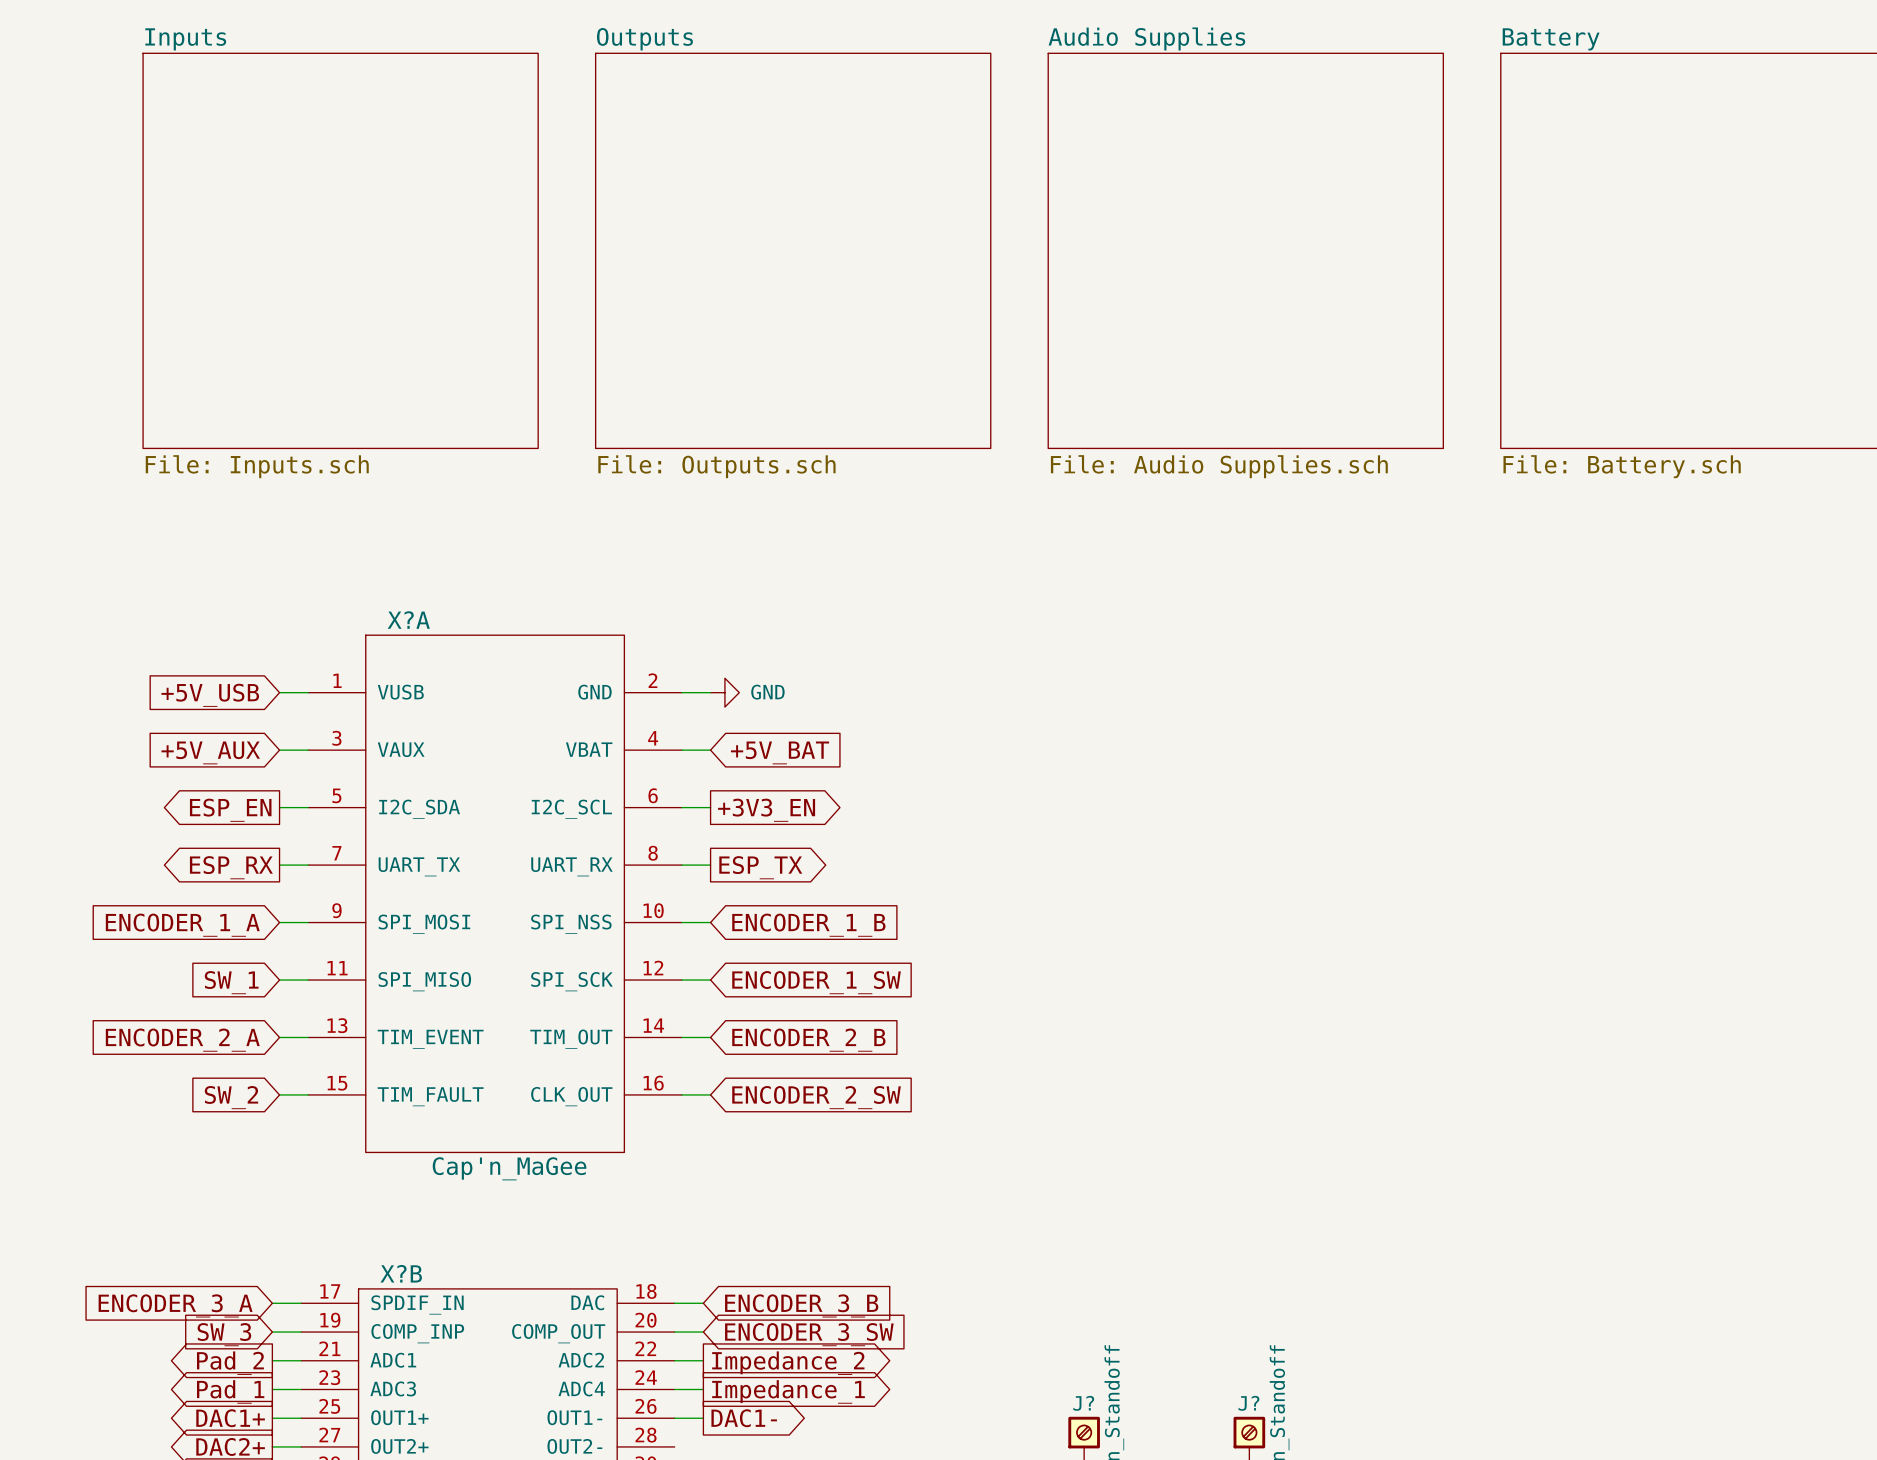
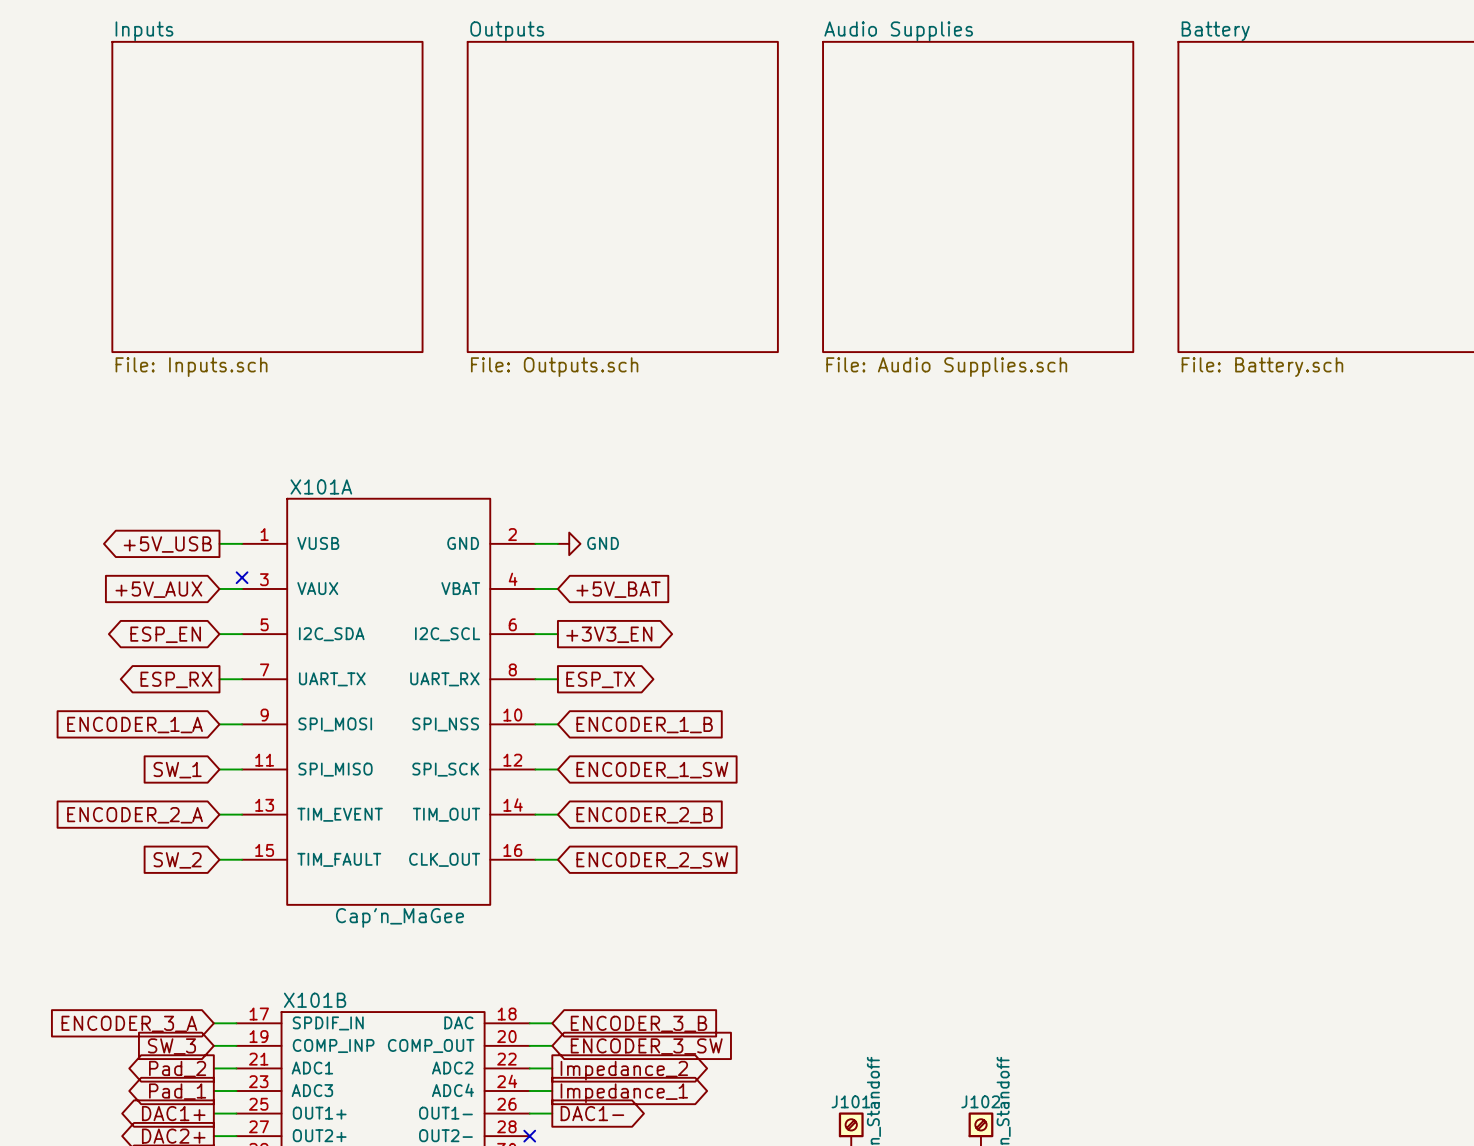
X?A name: X?A (408, 620) -> X101A (321, 486)
global label shape: input (210, 695) -> output (167, 544)
no-connect mark: none -> (242, 577)
global label shape: output (230, 810) -> bidirectional (165, 634)
X?B name: X?B (401, 1273) -> X101B (315, 1000)
J? name: J? (1083, 1403) -> J101 (850, 1101)
J? name: J? (1248, 1403) -> J102 (980, 1101)
no-connect mark: none -> (529, 1136)

